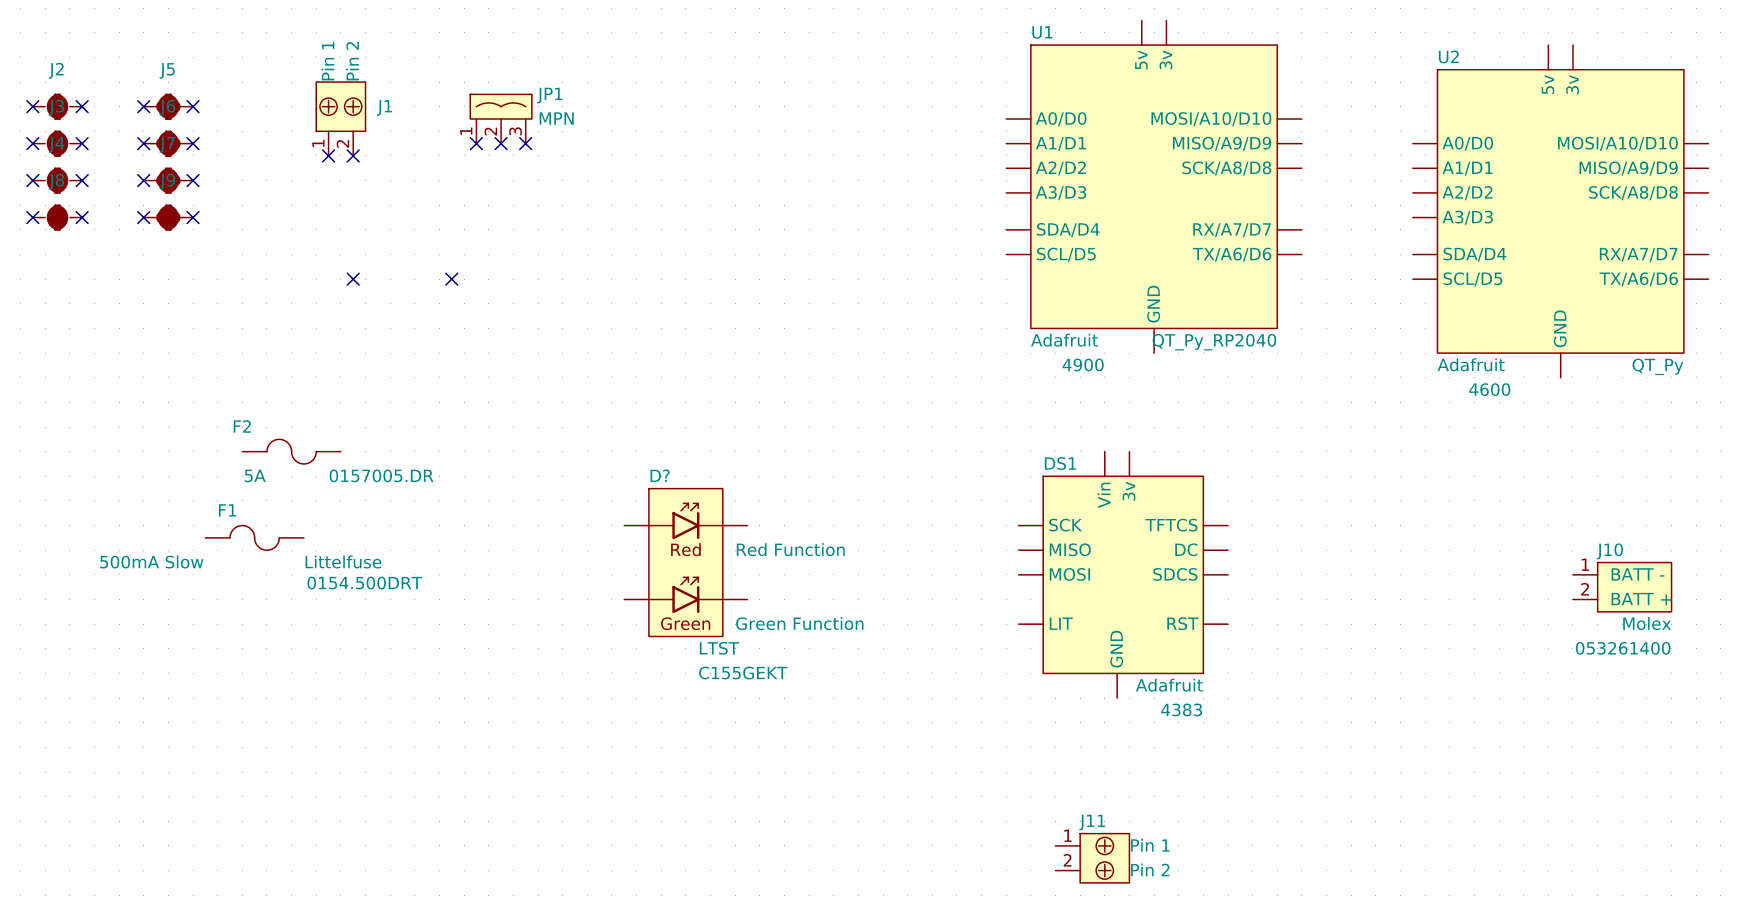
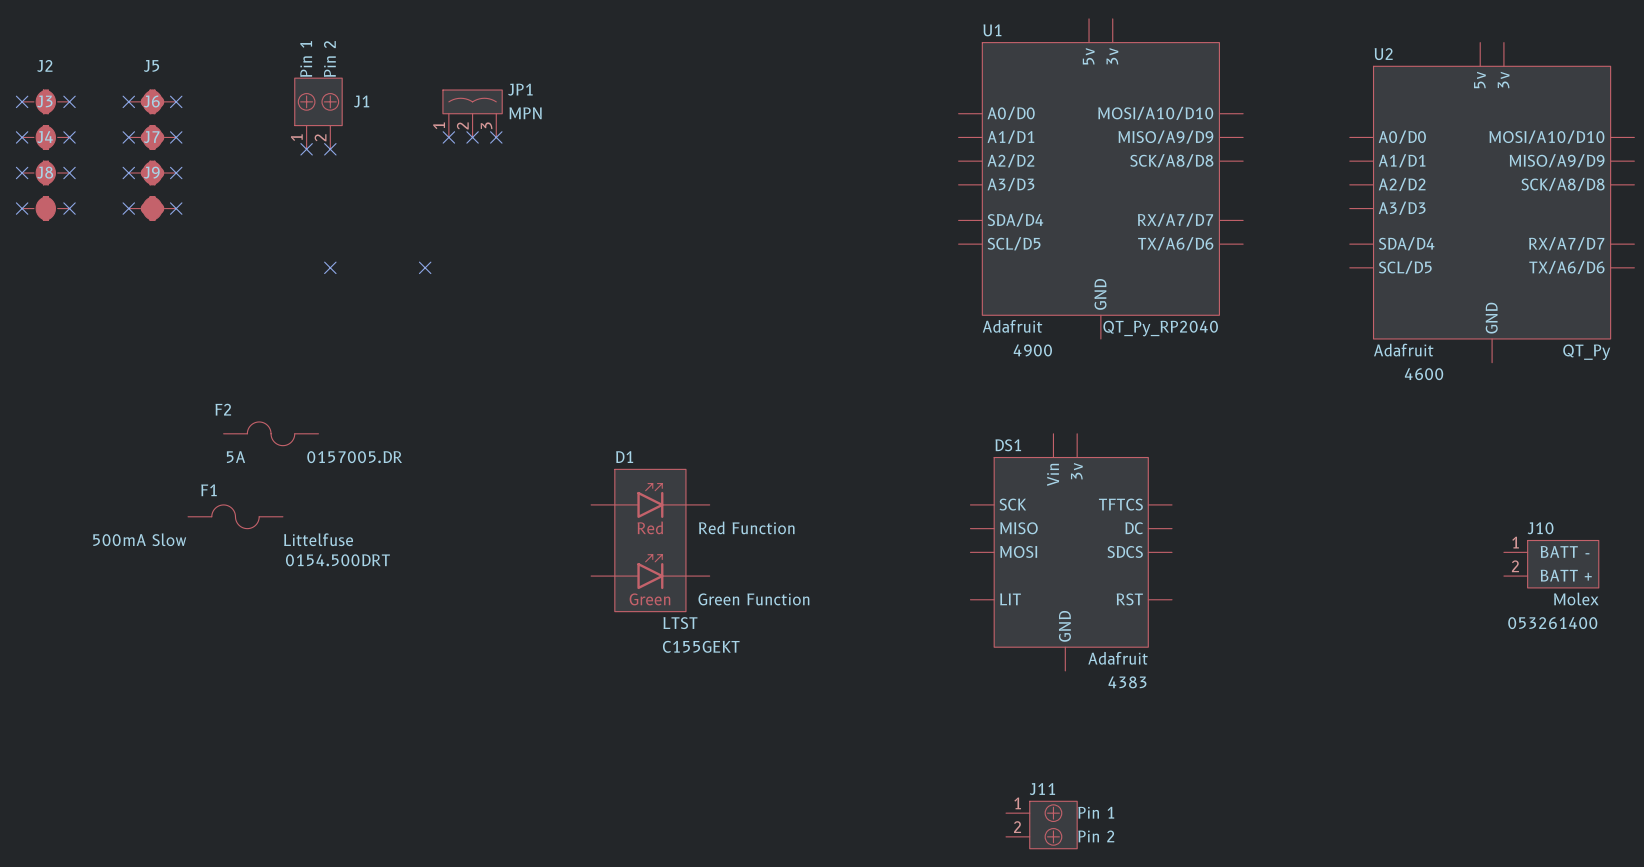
D? name: D? (660, 475) -> D1 (624, 457)

